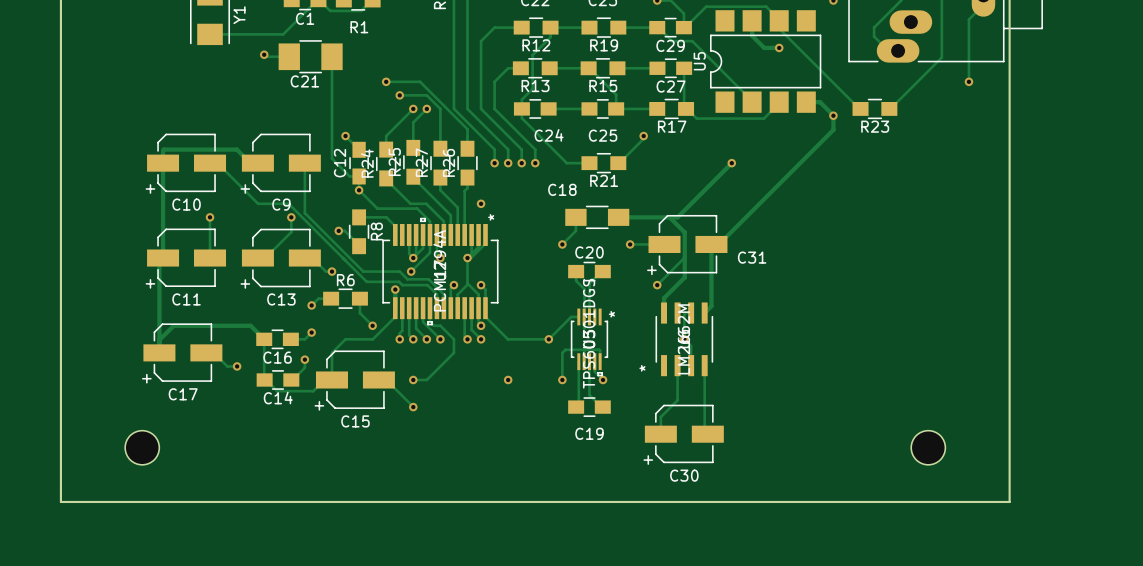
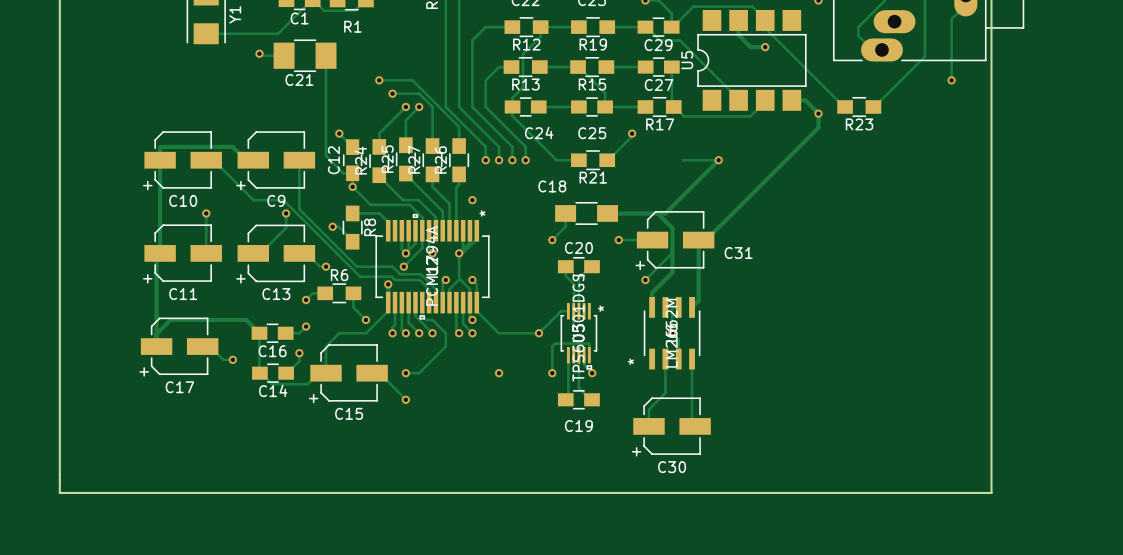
track: none -> (718, 160) (683, 160)
part: (142, 447) -> none
part: (928, 447) -> none

